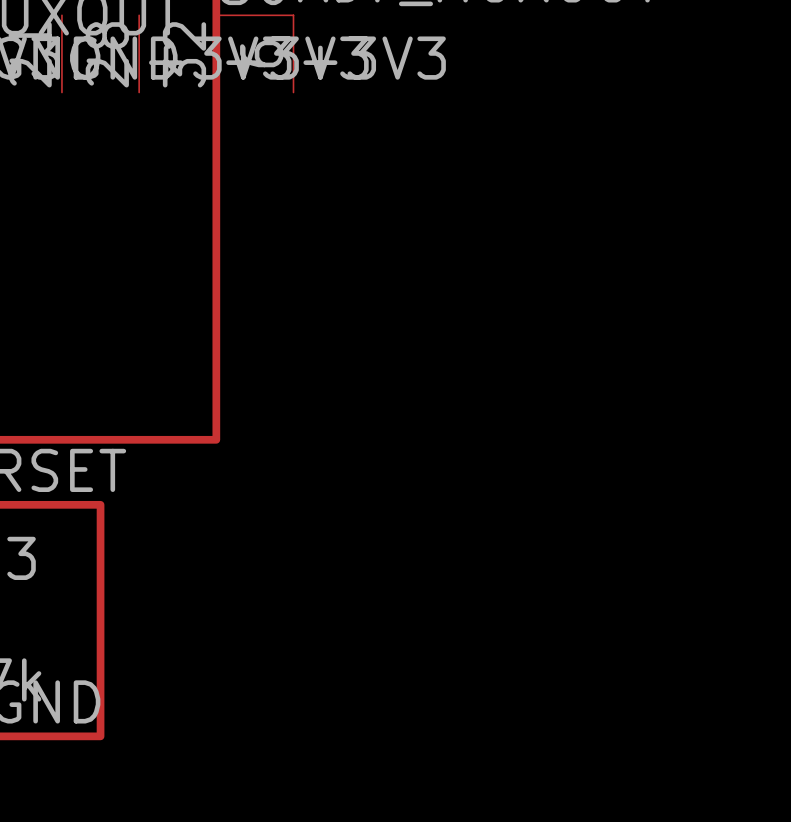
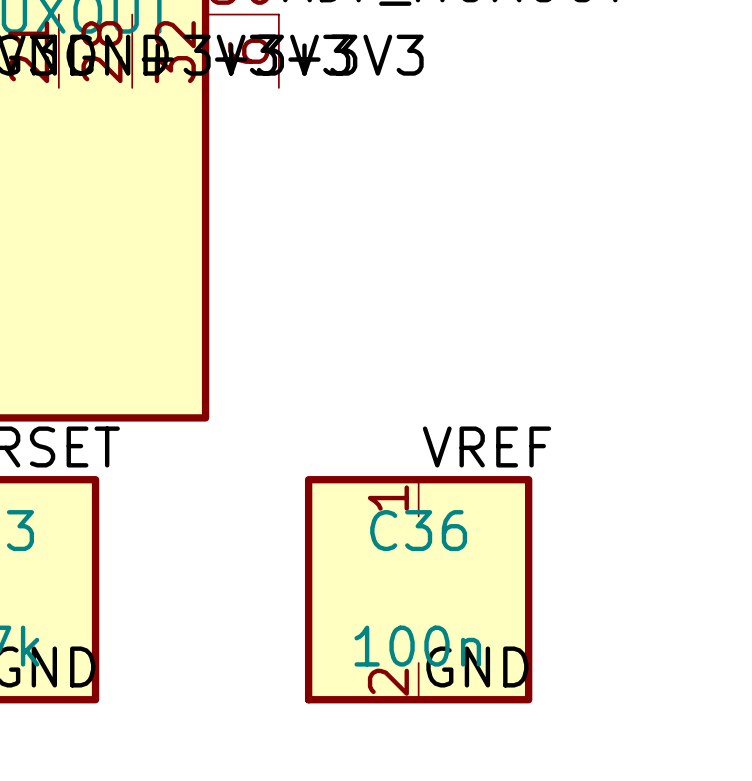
label: none -> VREF (487, 446)
C36: none -> 100n (418, 589)
label: none -> GND (477, 667)

